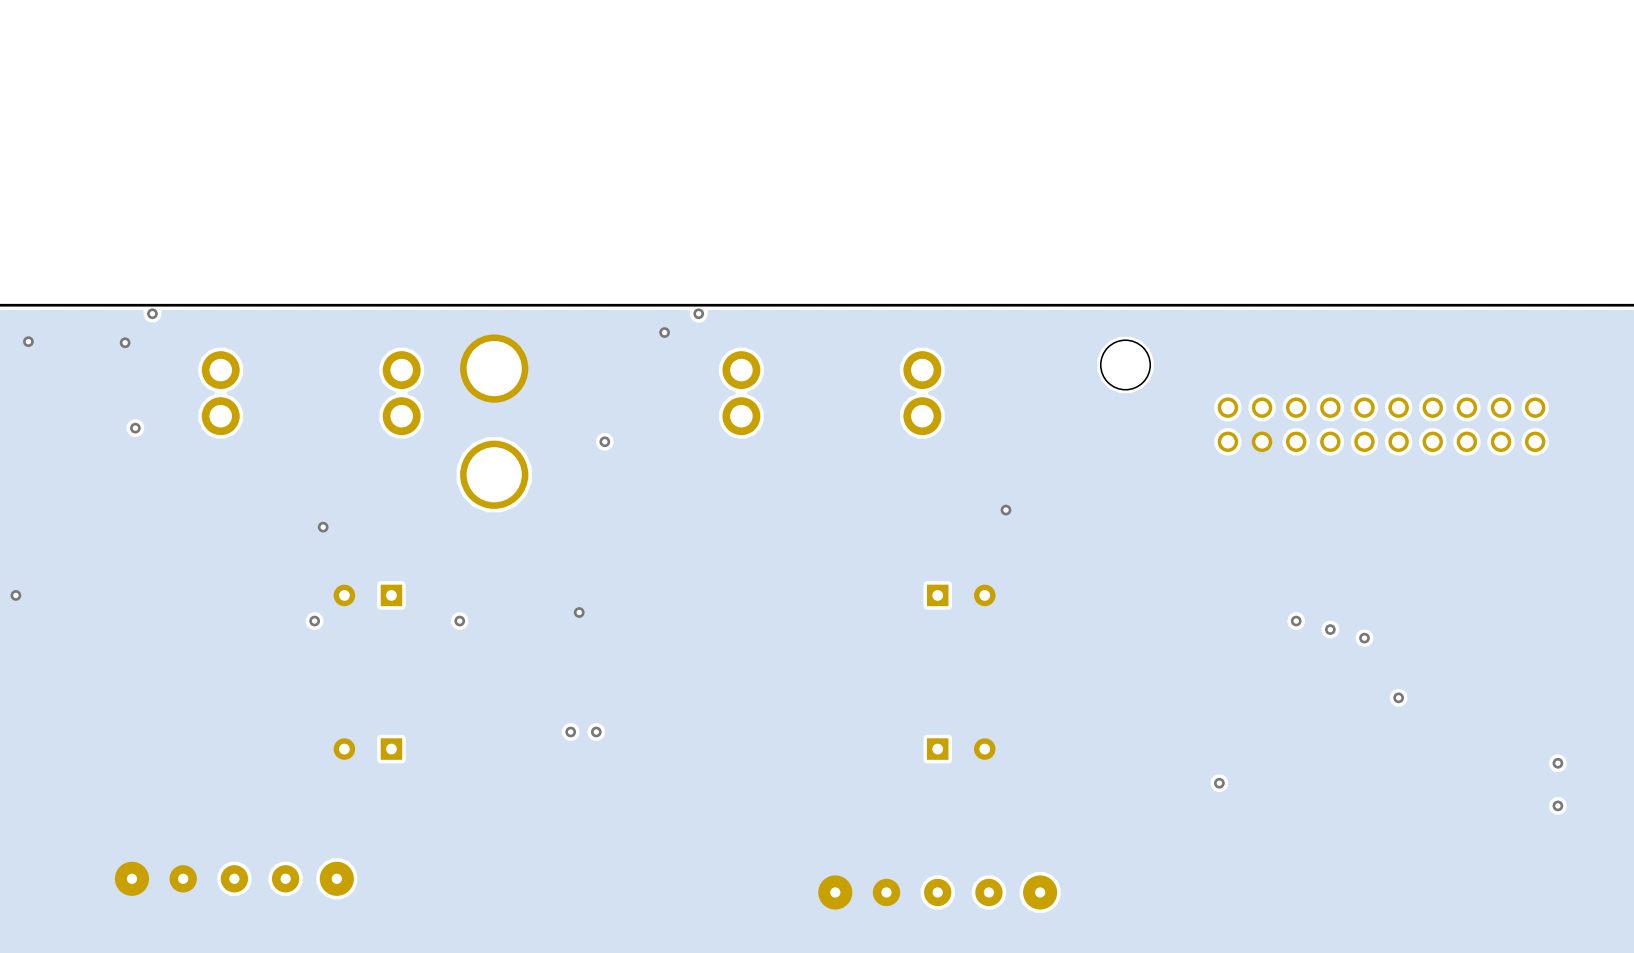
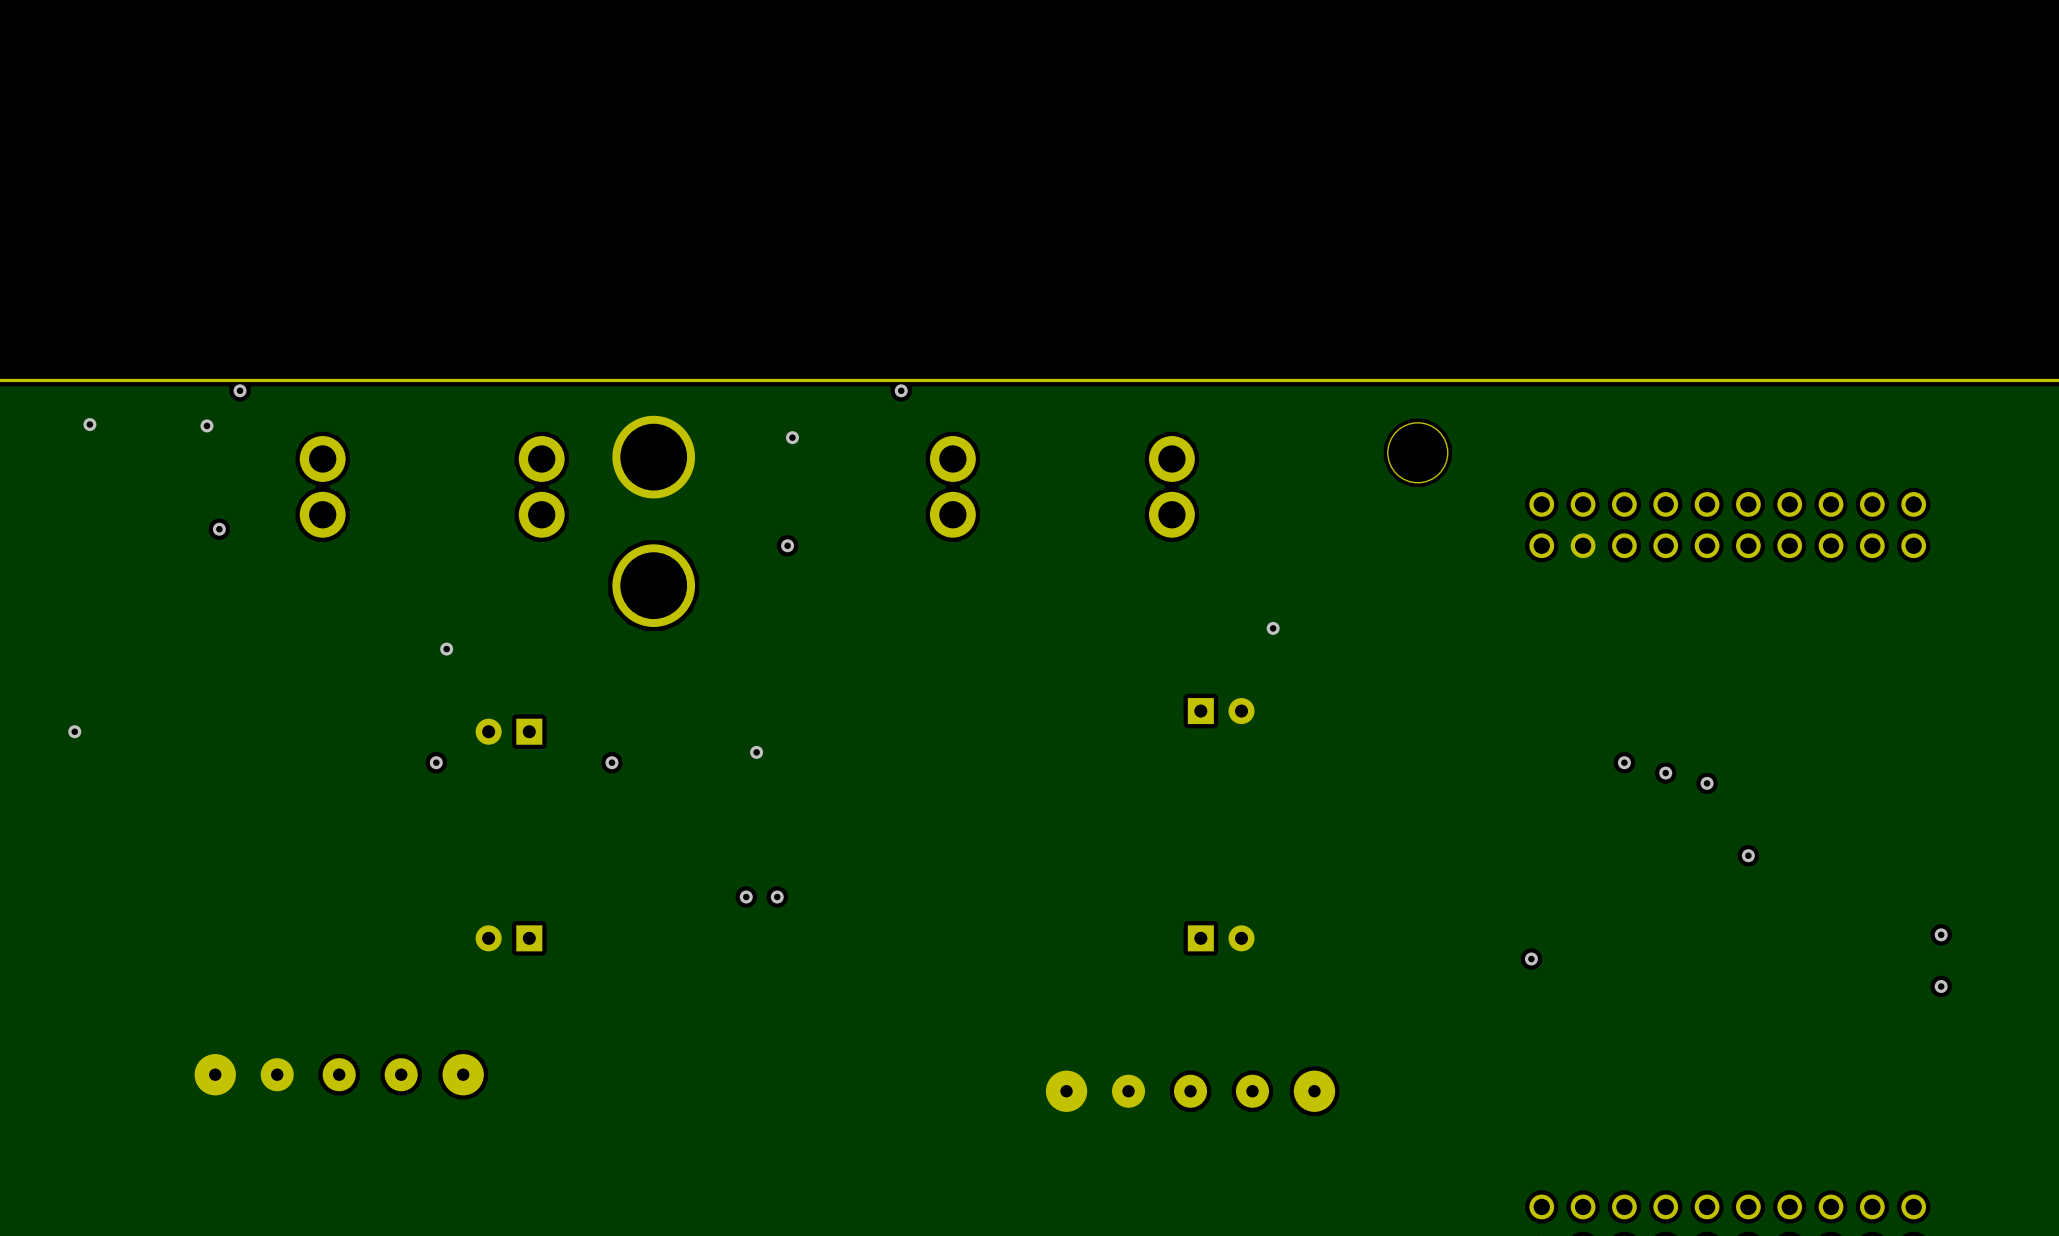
via position: (664, 332) -> (792, 437)
part: none -> (1221, 711)
part footprint: [333, 584, 403, 607] -> [475, 718, 543, 745]
part: (961, 595) -> none
part: (367, 749) -> none
part: (961, 749) -> none
part: none -> (508, 938)
part: none -> (1221, 938)

